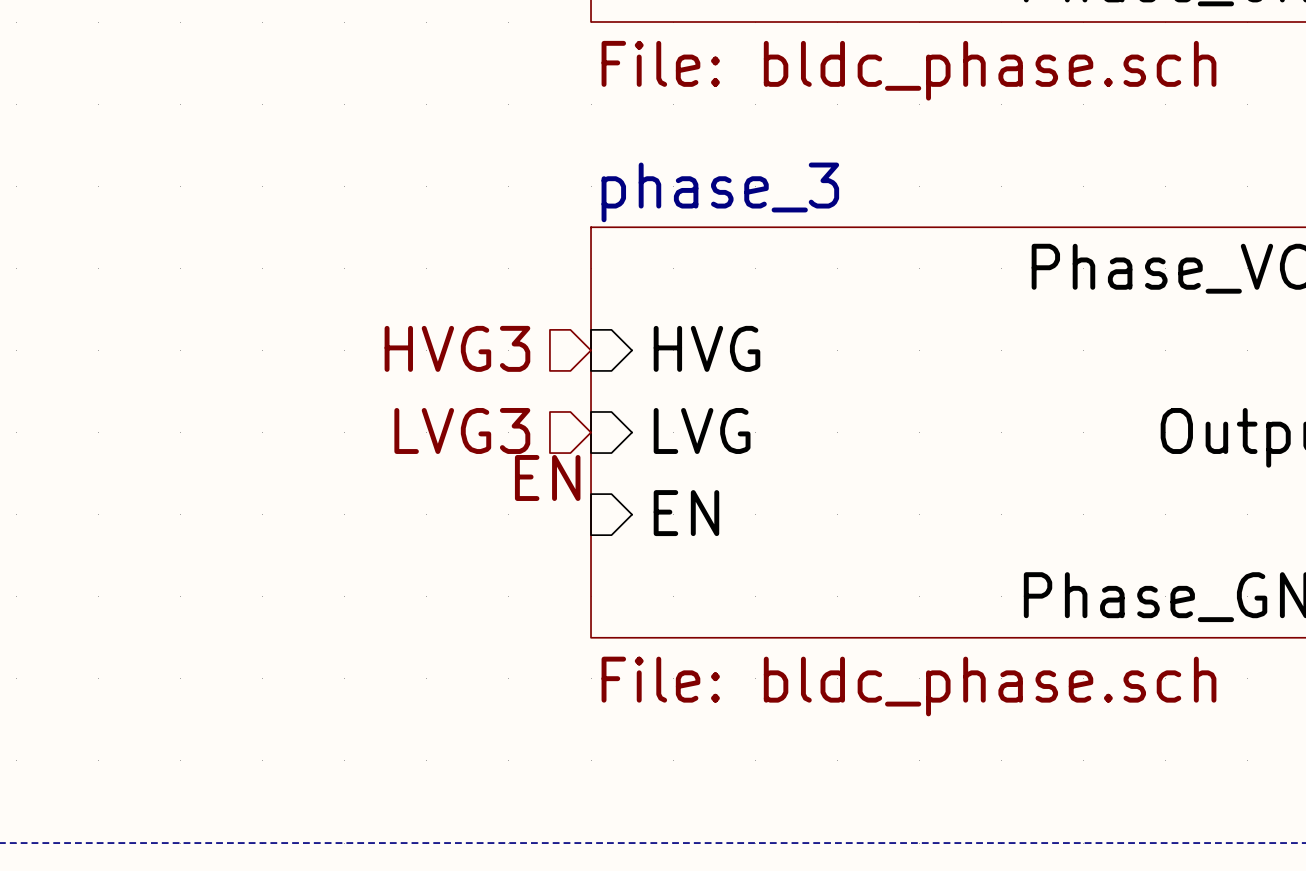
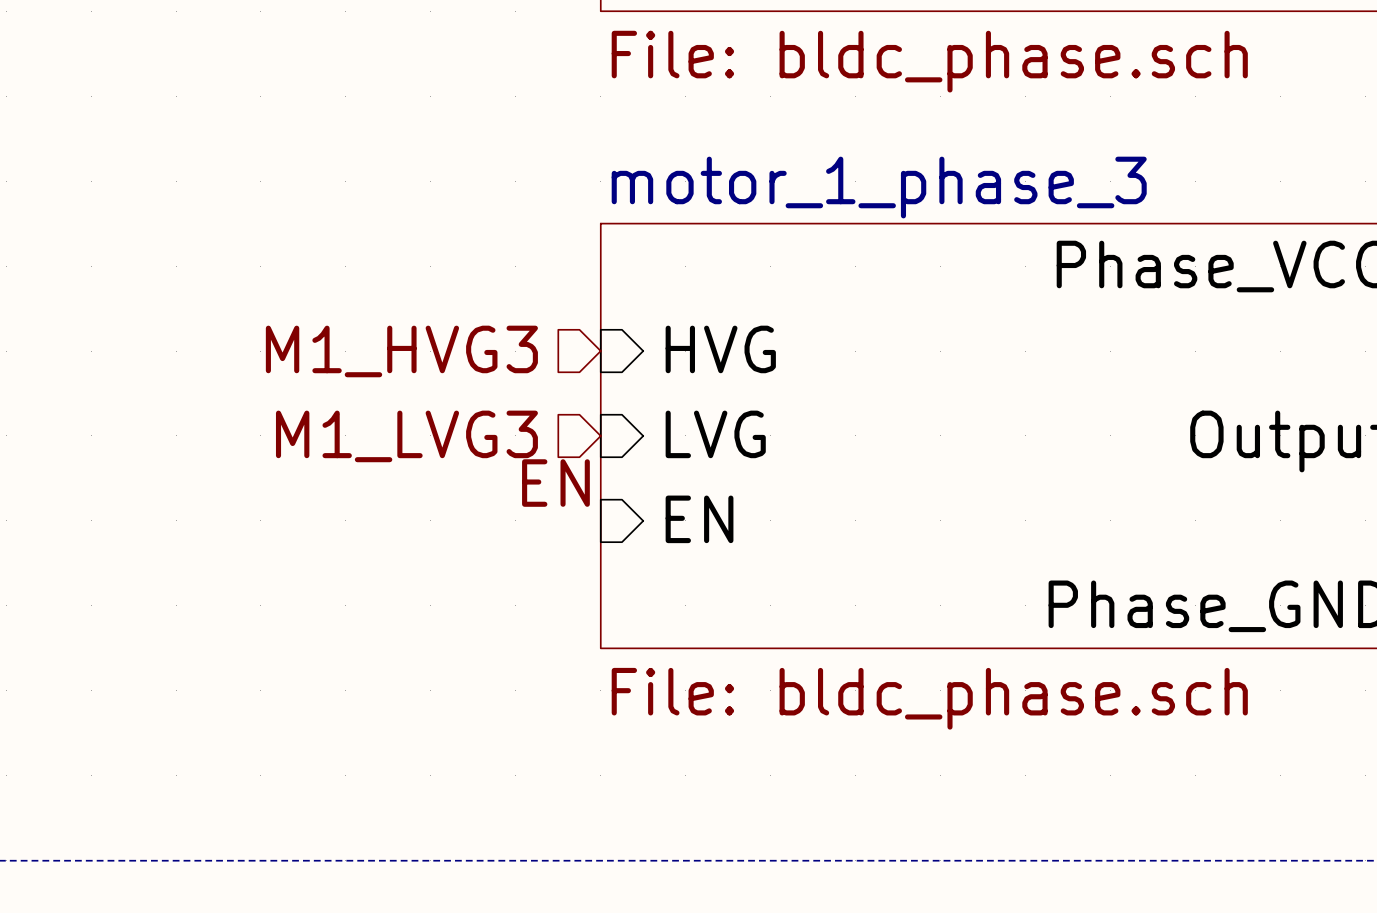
sheet phase_3 name: phase_3 (720, 192) -> motor_1_phase_3 (879, 187)
hierarchical label: HVG3 (457, 348) -> M1_HVG3 (401, 351)
hierarchical label: LVG3 (462, 430) -> M1_LVG3 (406, 436)

